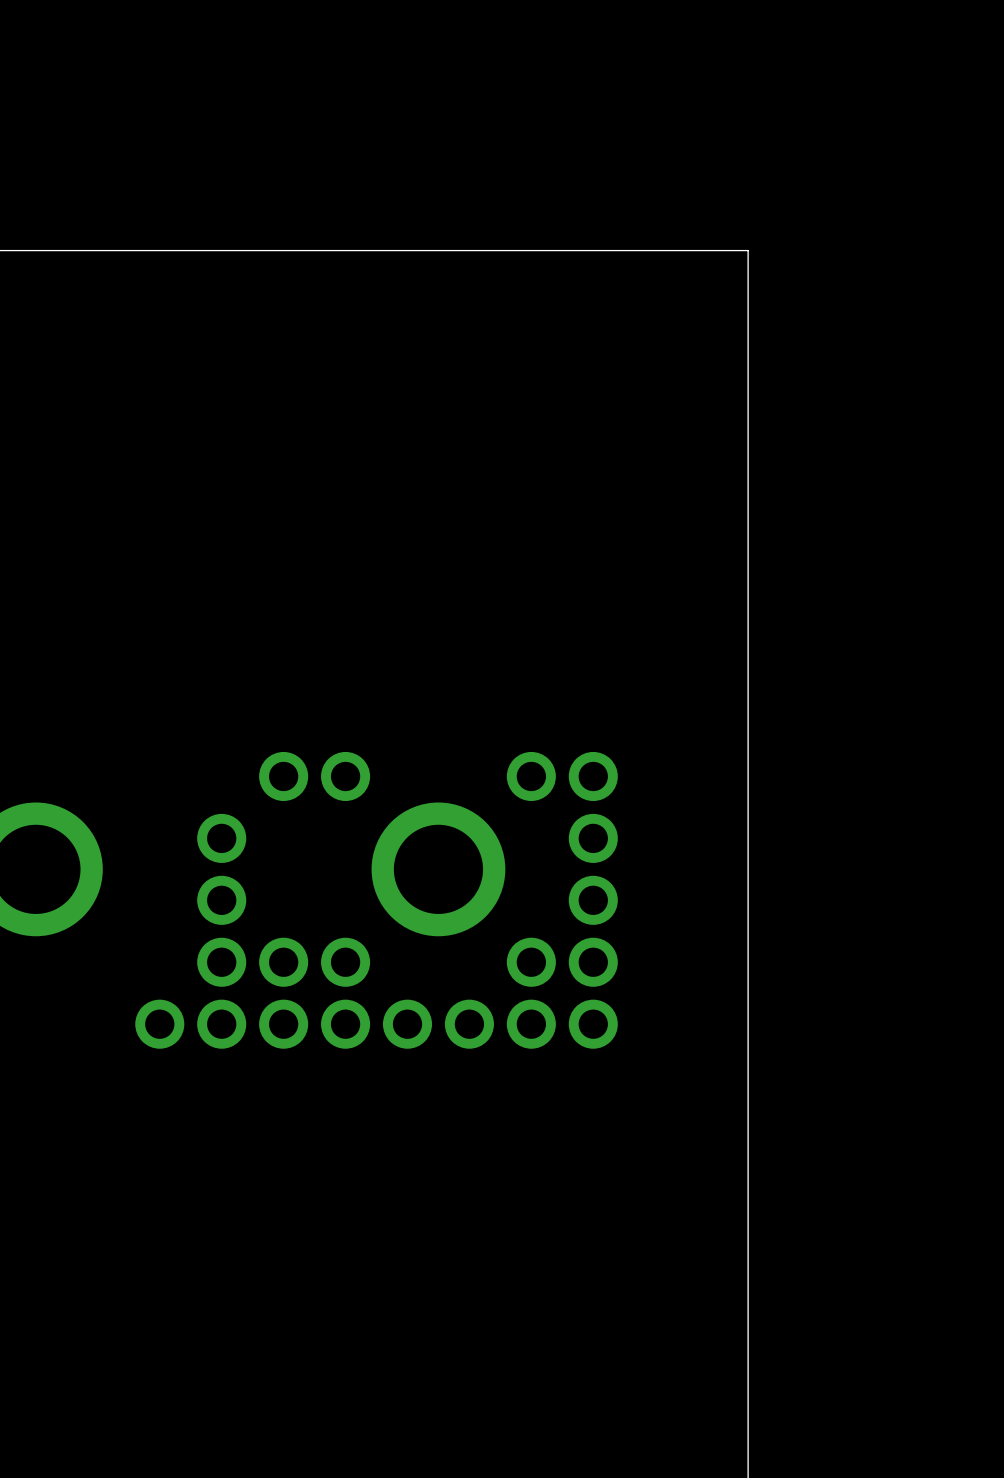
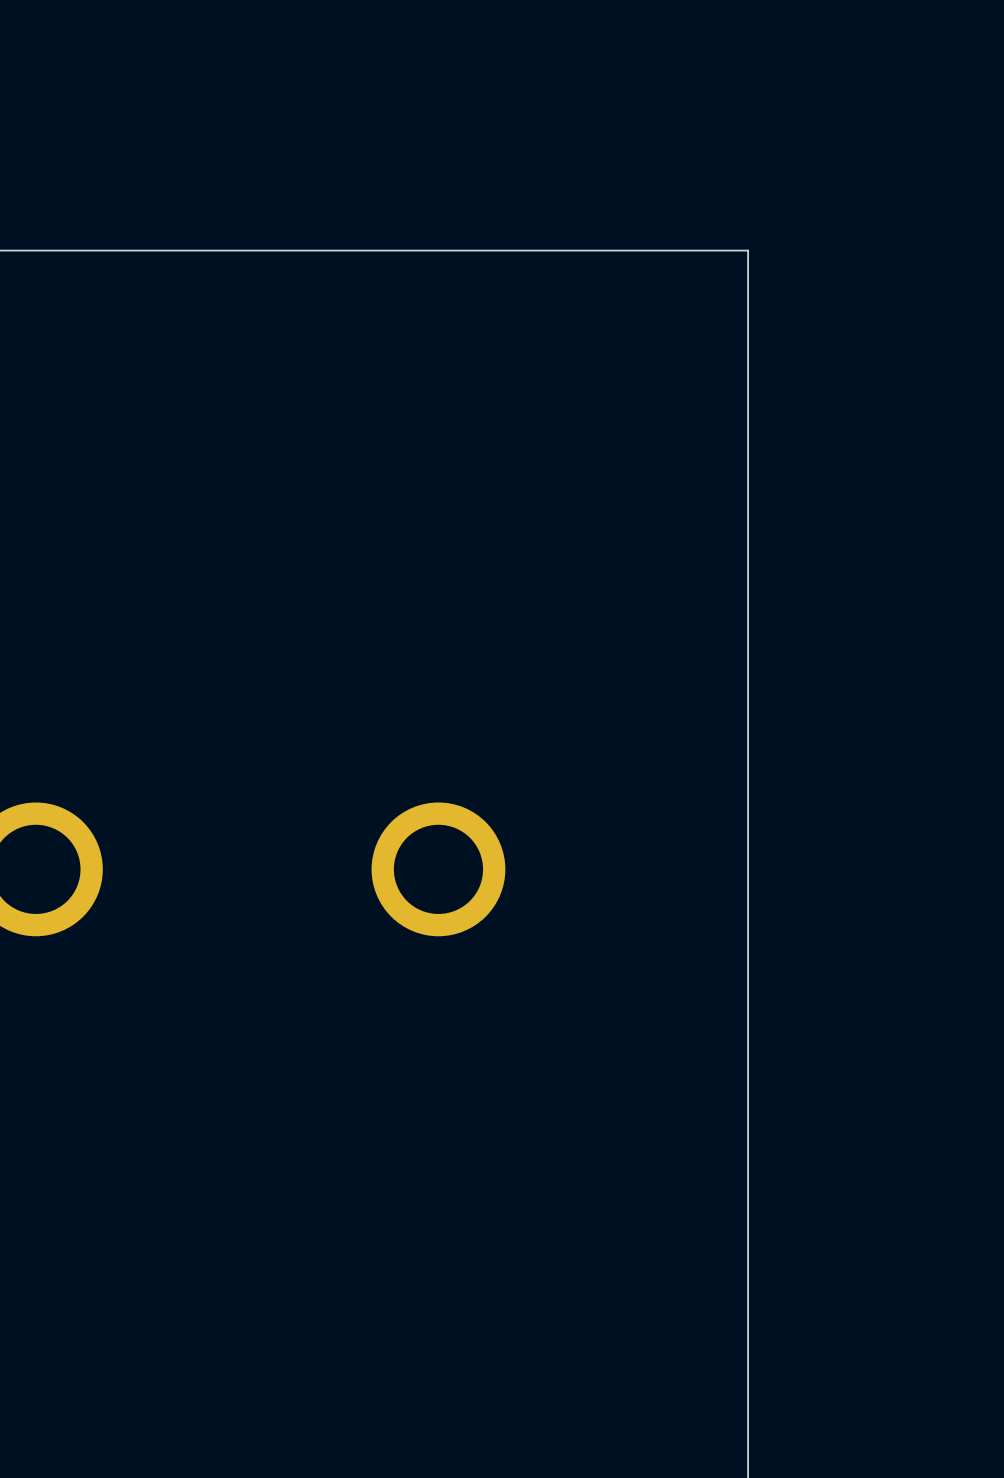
via: (283, 776) -> none
via: (345, 776) -> none
via: (531, 776) -> none
via: (593, 776) -> none
via: (221, 838) -> none
via: (593, 838) -> none
via: (221, 900) -> none
via: (593, 900) -> none
via: (221, 962) -> none
via: (283, 962) -> none
via: (345, 962) -> none
via: (531, 962) -> none
via: (593, 962) -> none
via: (159, 1024) -> none
via: (221, 1024) -> none
via: (283, 1024) -> none
via: (345, 1024) -> none
via: (407, 1024) -> none
via: (469, 1024) -> none
via: (531, 1024) -> none
via: (593, 1024) -> none

